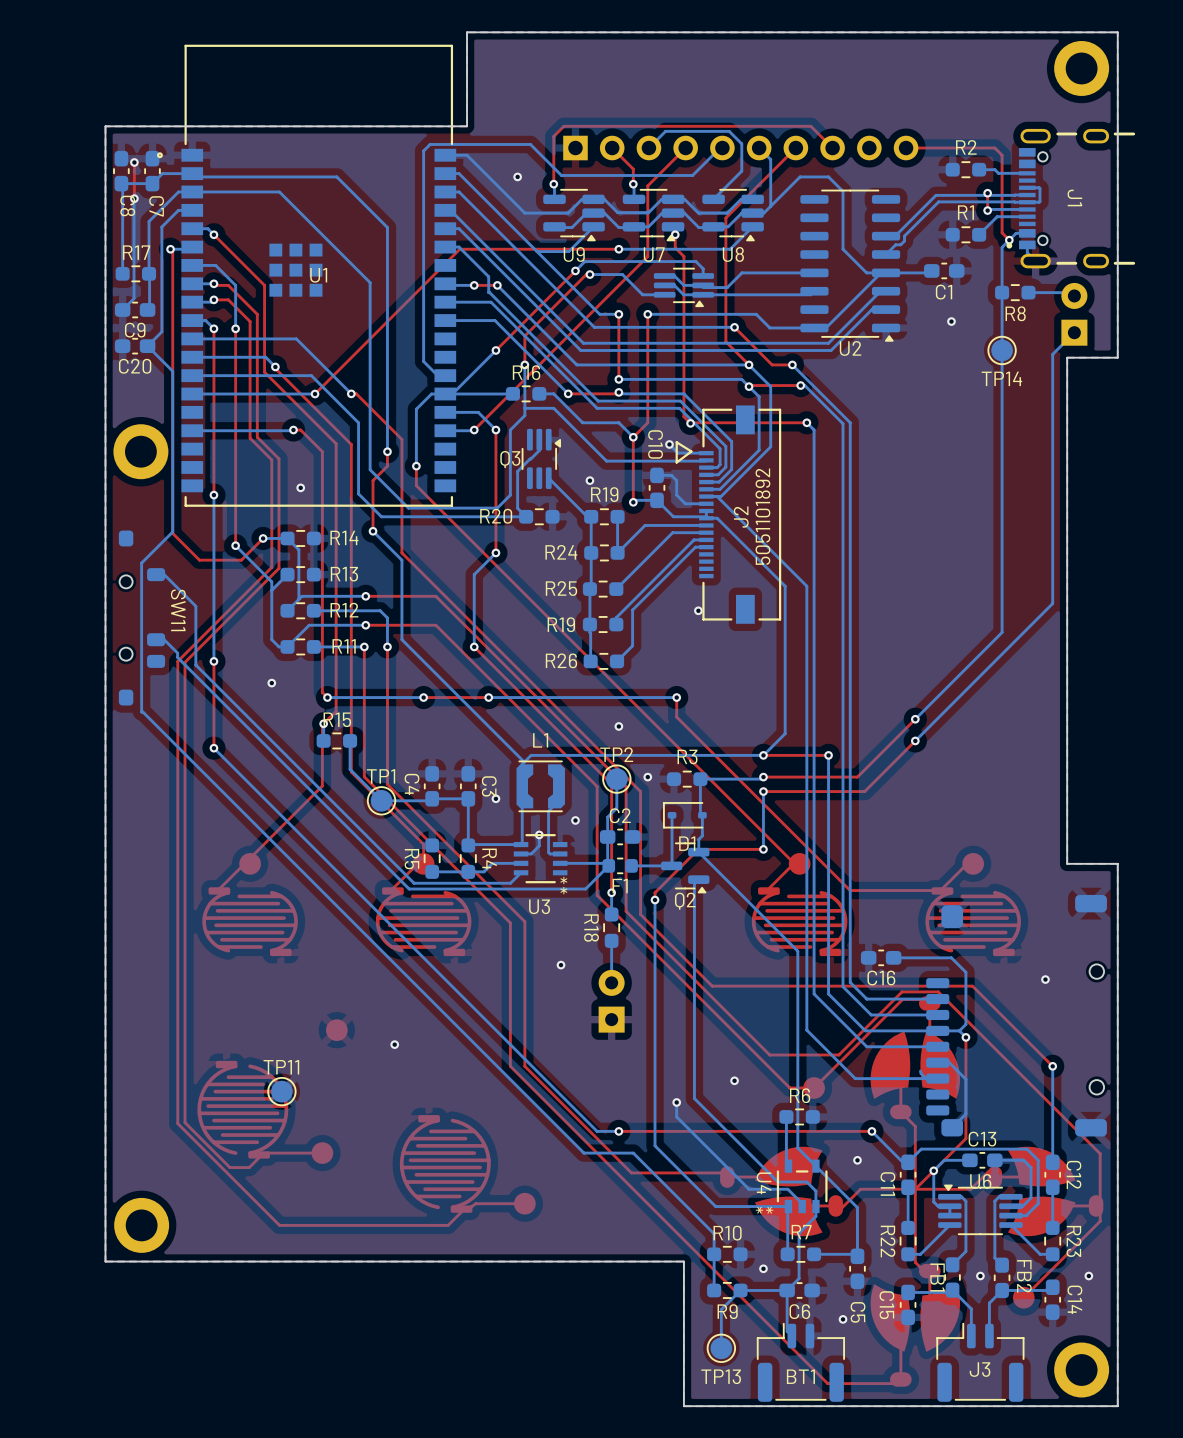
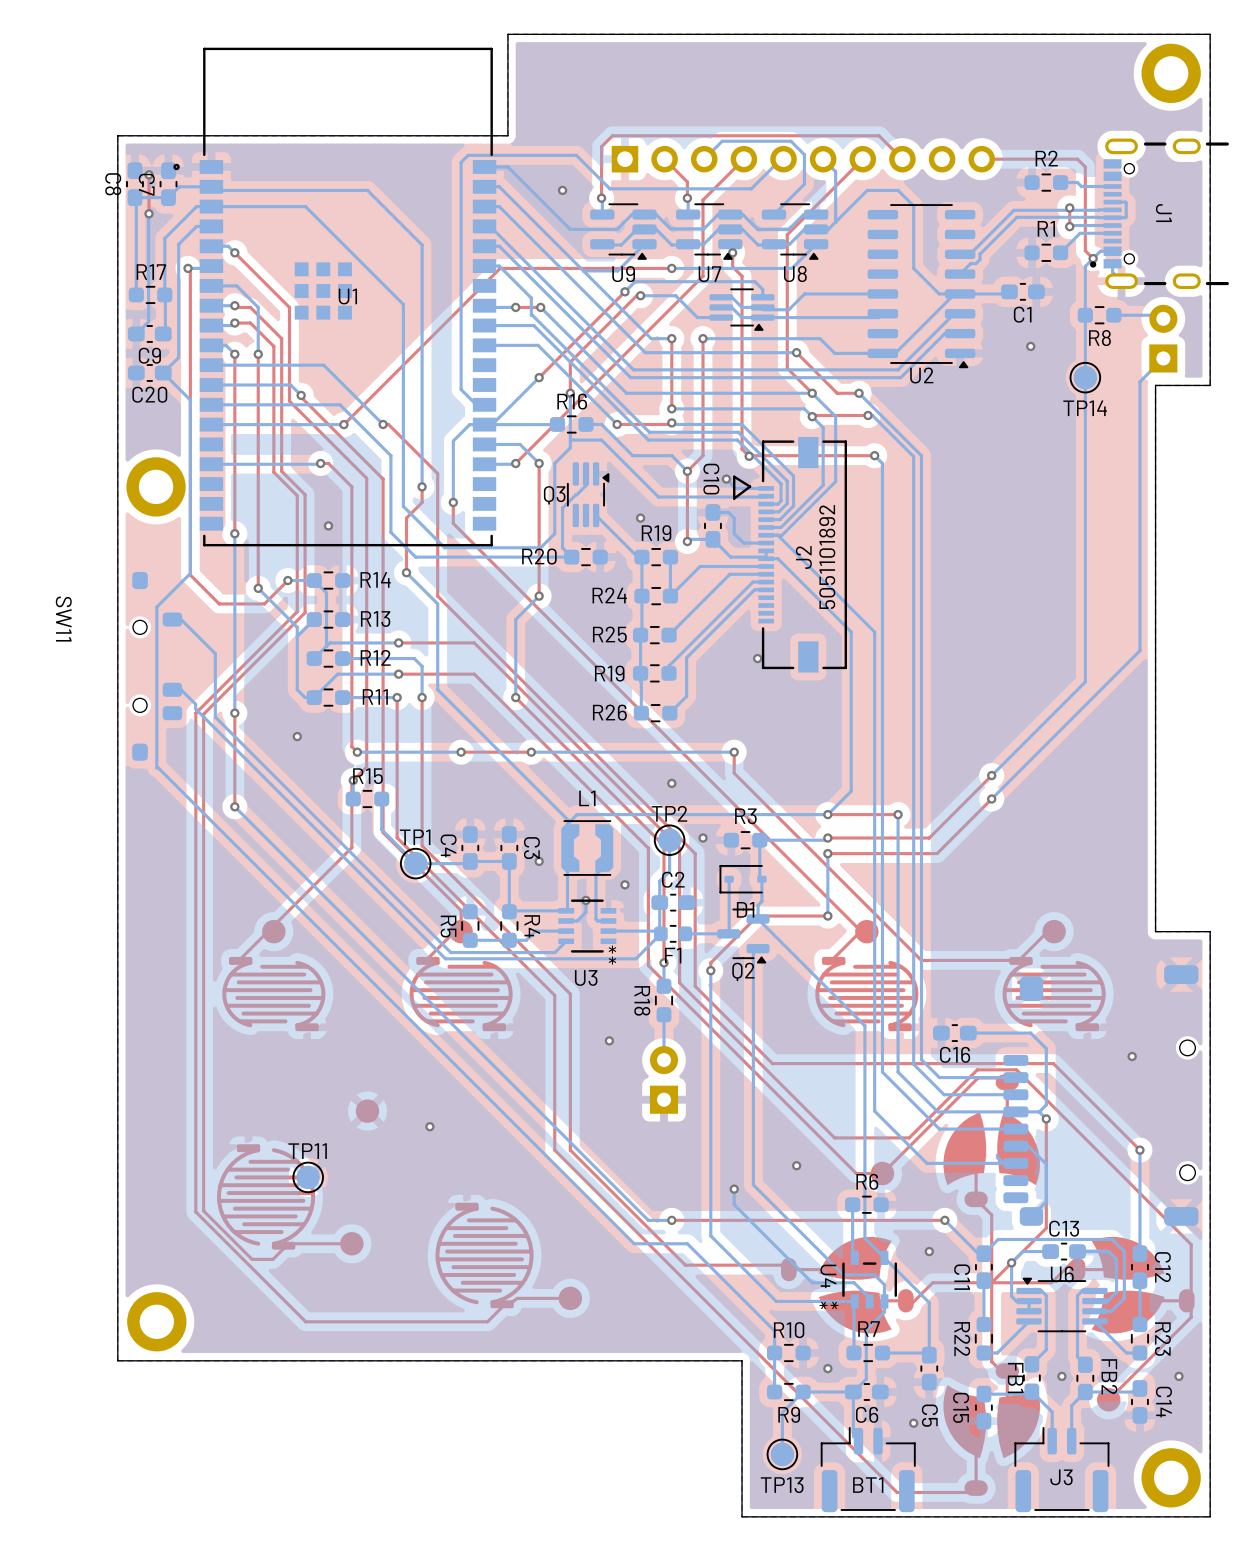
C8 name position: C8 (127, 205) -> C8 (113, 184)
C7 name position: C7 (156, 206) -> C7 (146, 184)
SW11 name position: SW11 (178, 610) -> SW11 (63, 619)

